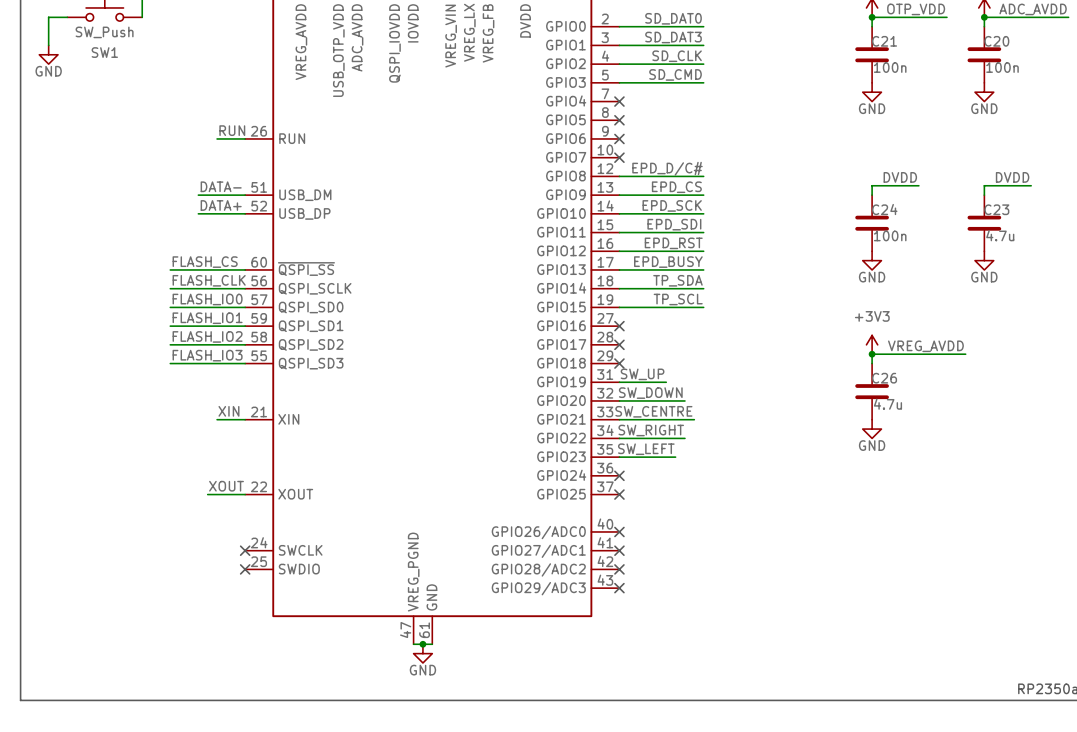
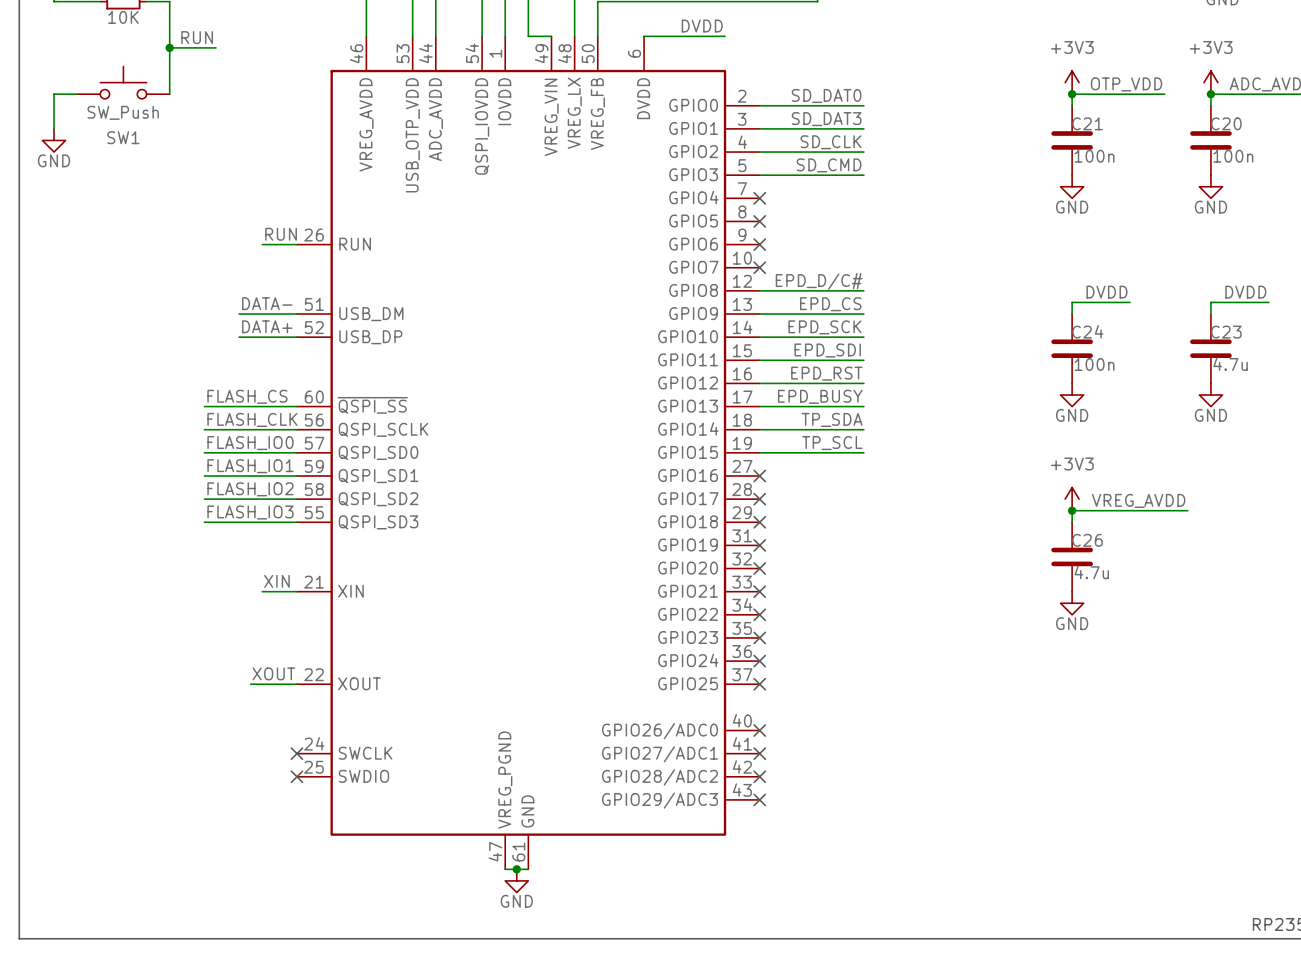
label: SW_UP (642, 374) -> none
wire: (619, 382) (666, 382) -> none
no-connect mark: none -> (759, 545)
label: SW_DOWN (650, 393) -> none
wire: (619, 400) (684, 400) -> none
no-connect mark: none -> (759, 568)
label: SW_CENTRE (653, 411) -> none
wire: (619, 419) (694, 419) -> none
no-connect mark: none -> (759, 591)
label: SW_RIGHT (651, 430) -> none
wire: (619, 438) (684, 438) -> none
no-connect mark: none -> (759, 614)
label: SW_LEFT (646, 449) -> none
wire: (619, 457) (675, 457) -> none
no-connect mark: none -> (759, 637)

